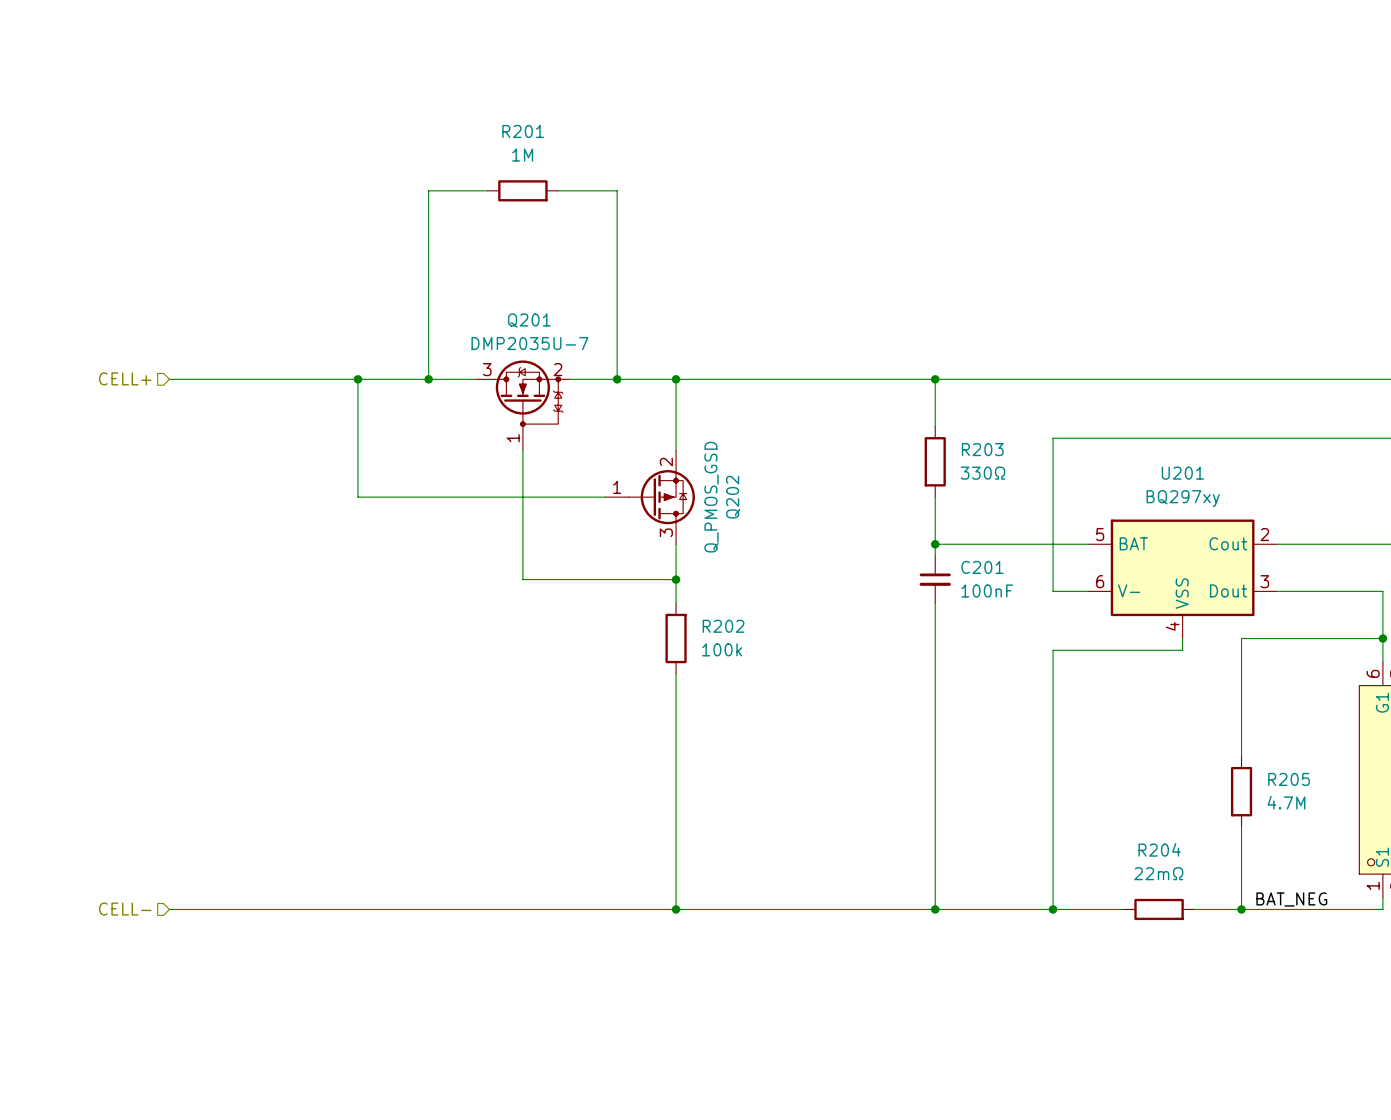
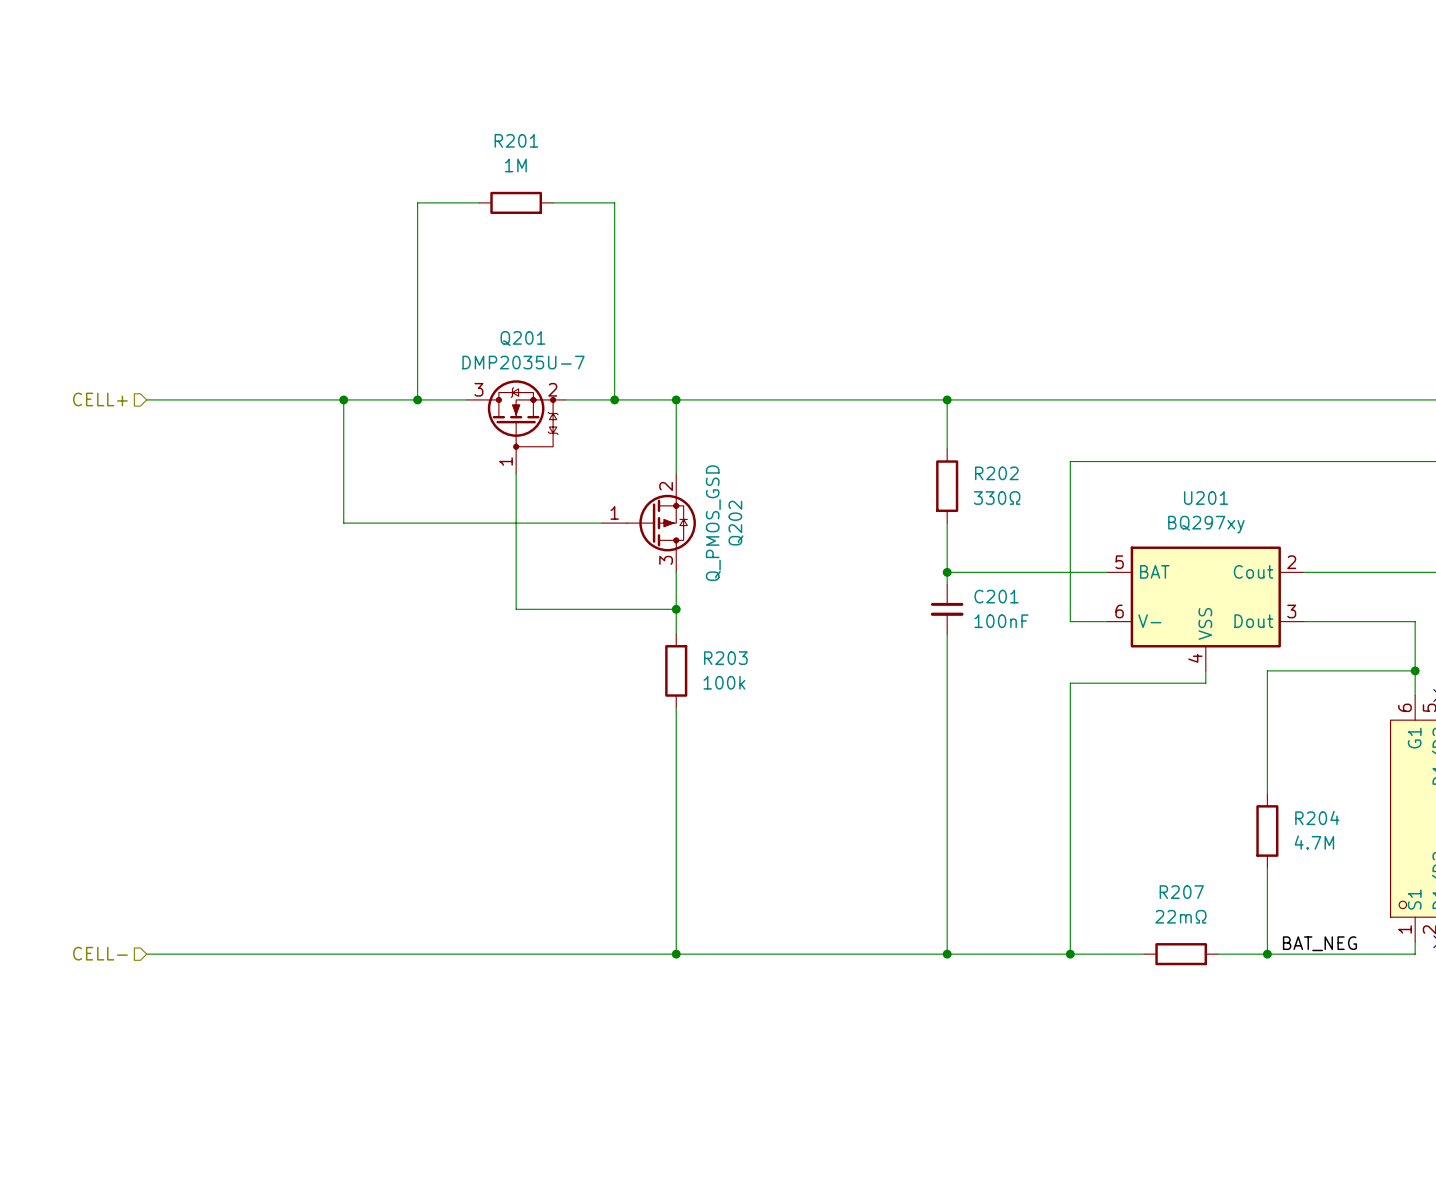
R203 name: R203 (982, 449) -> R202 (996, 473)
R202 name: R202 (723, 626) -> R203 (725, 658)
R205 name: R205 (1289, 779) -> R204 (1317, 817)
R204 name: R204 (1159, 849) -> R207 (1181, 892)

